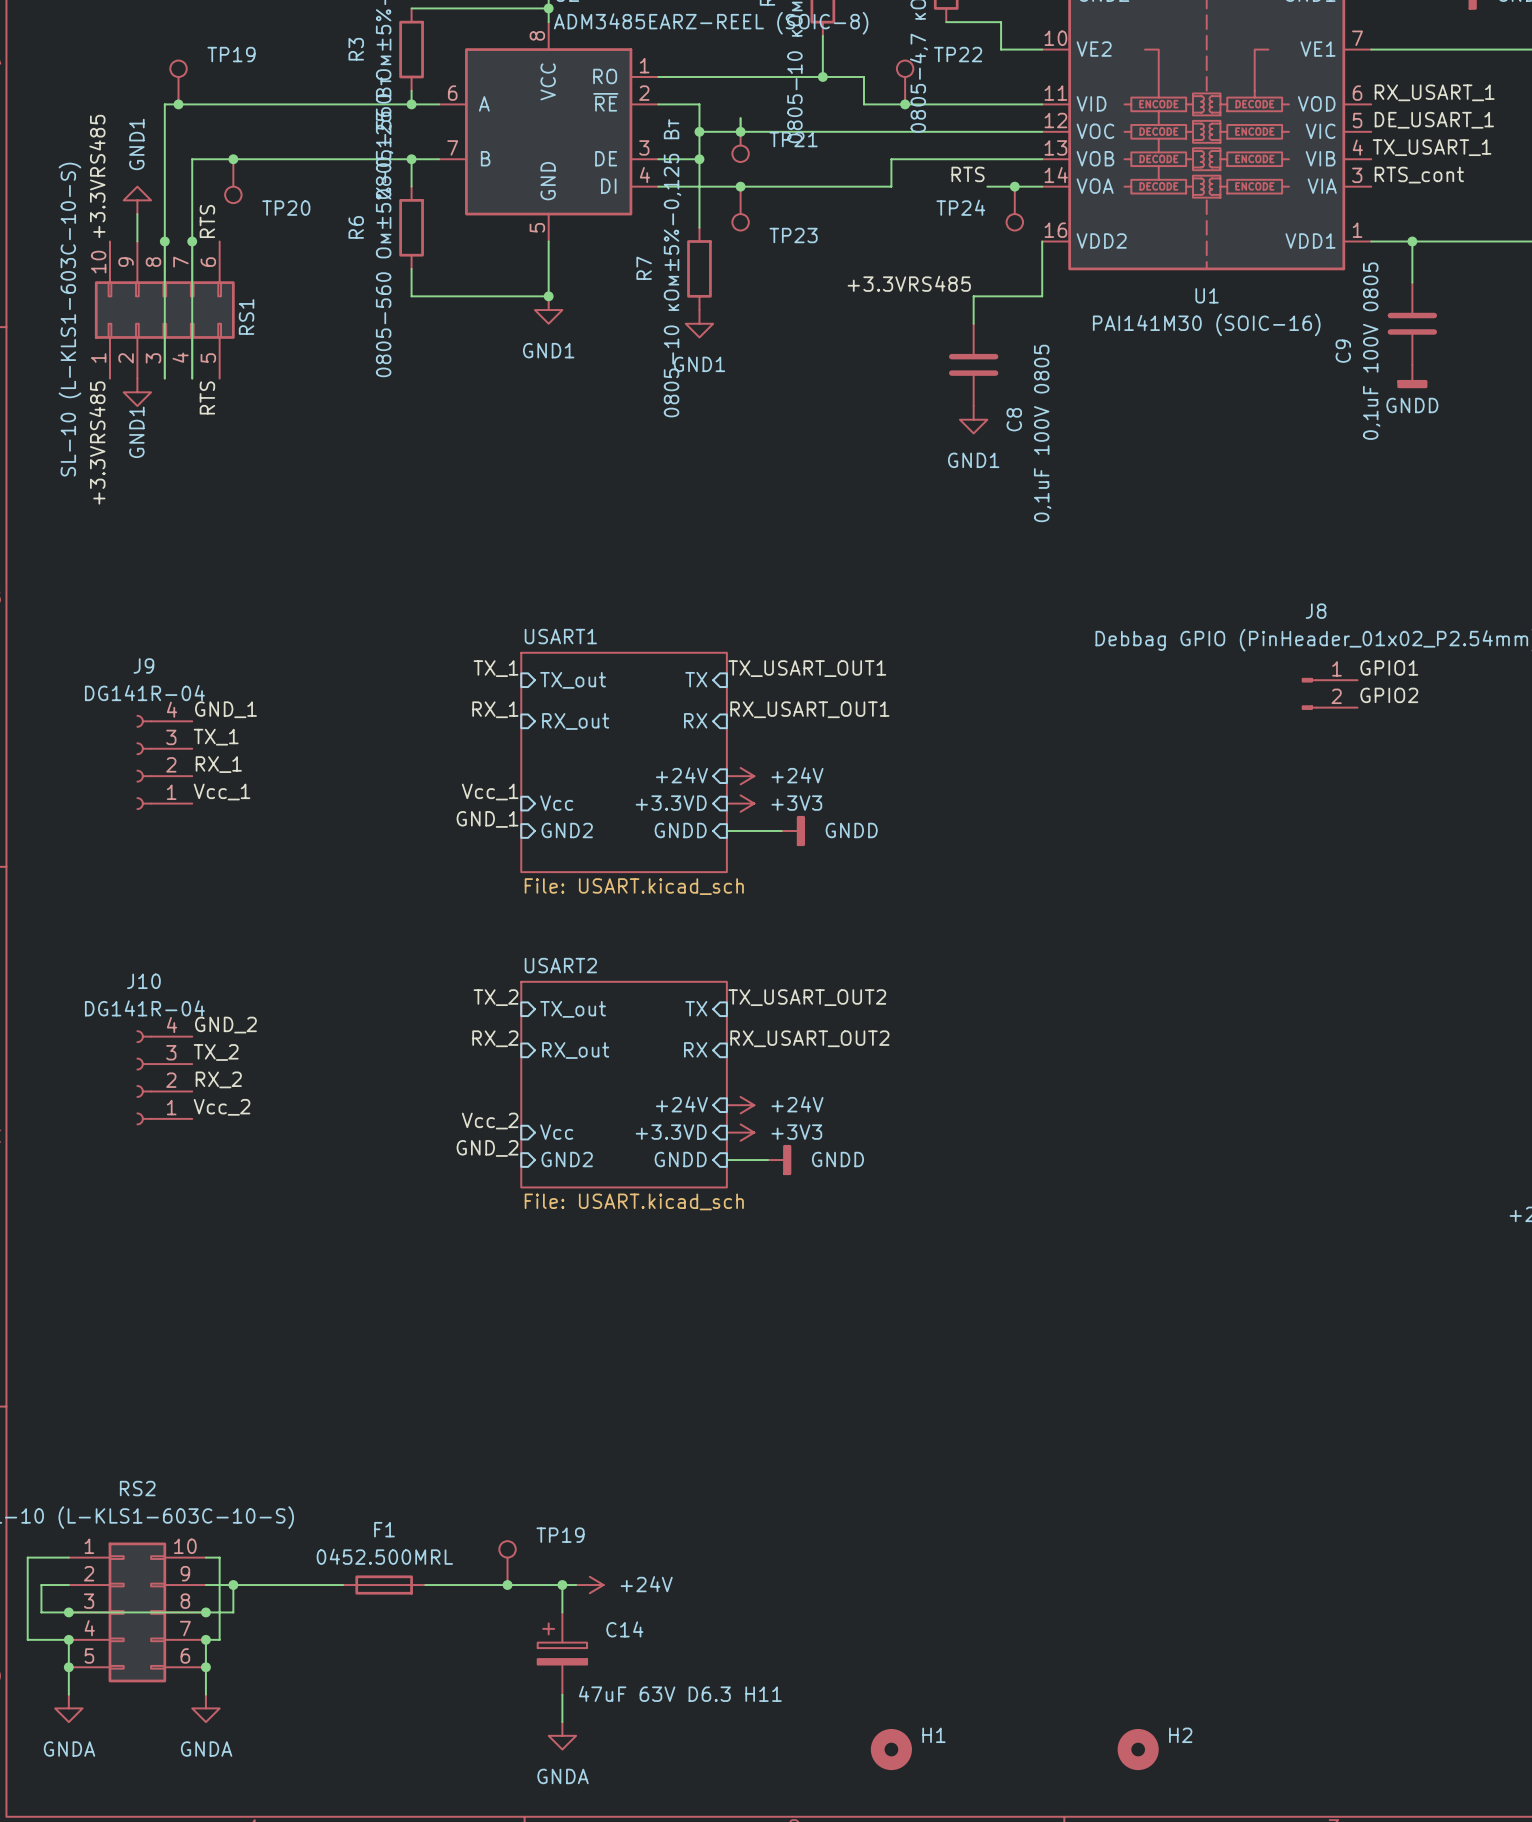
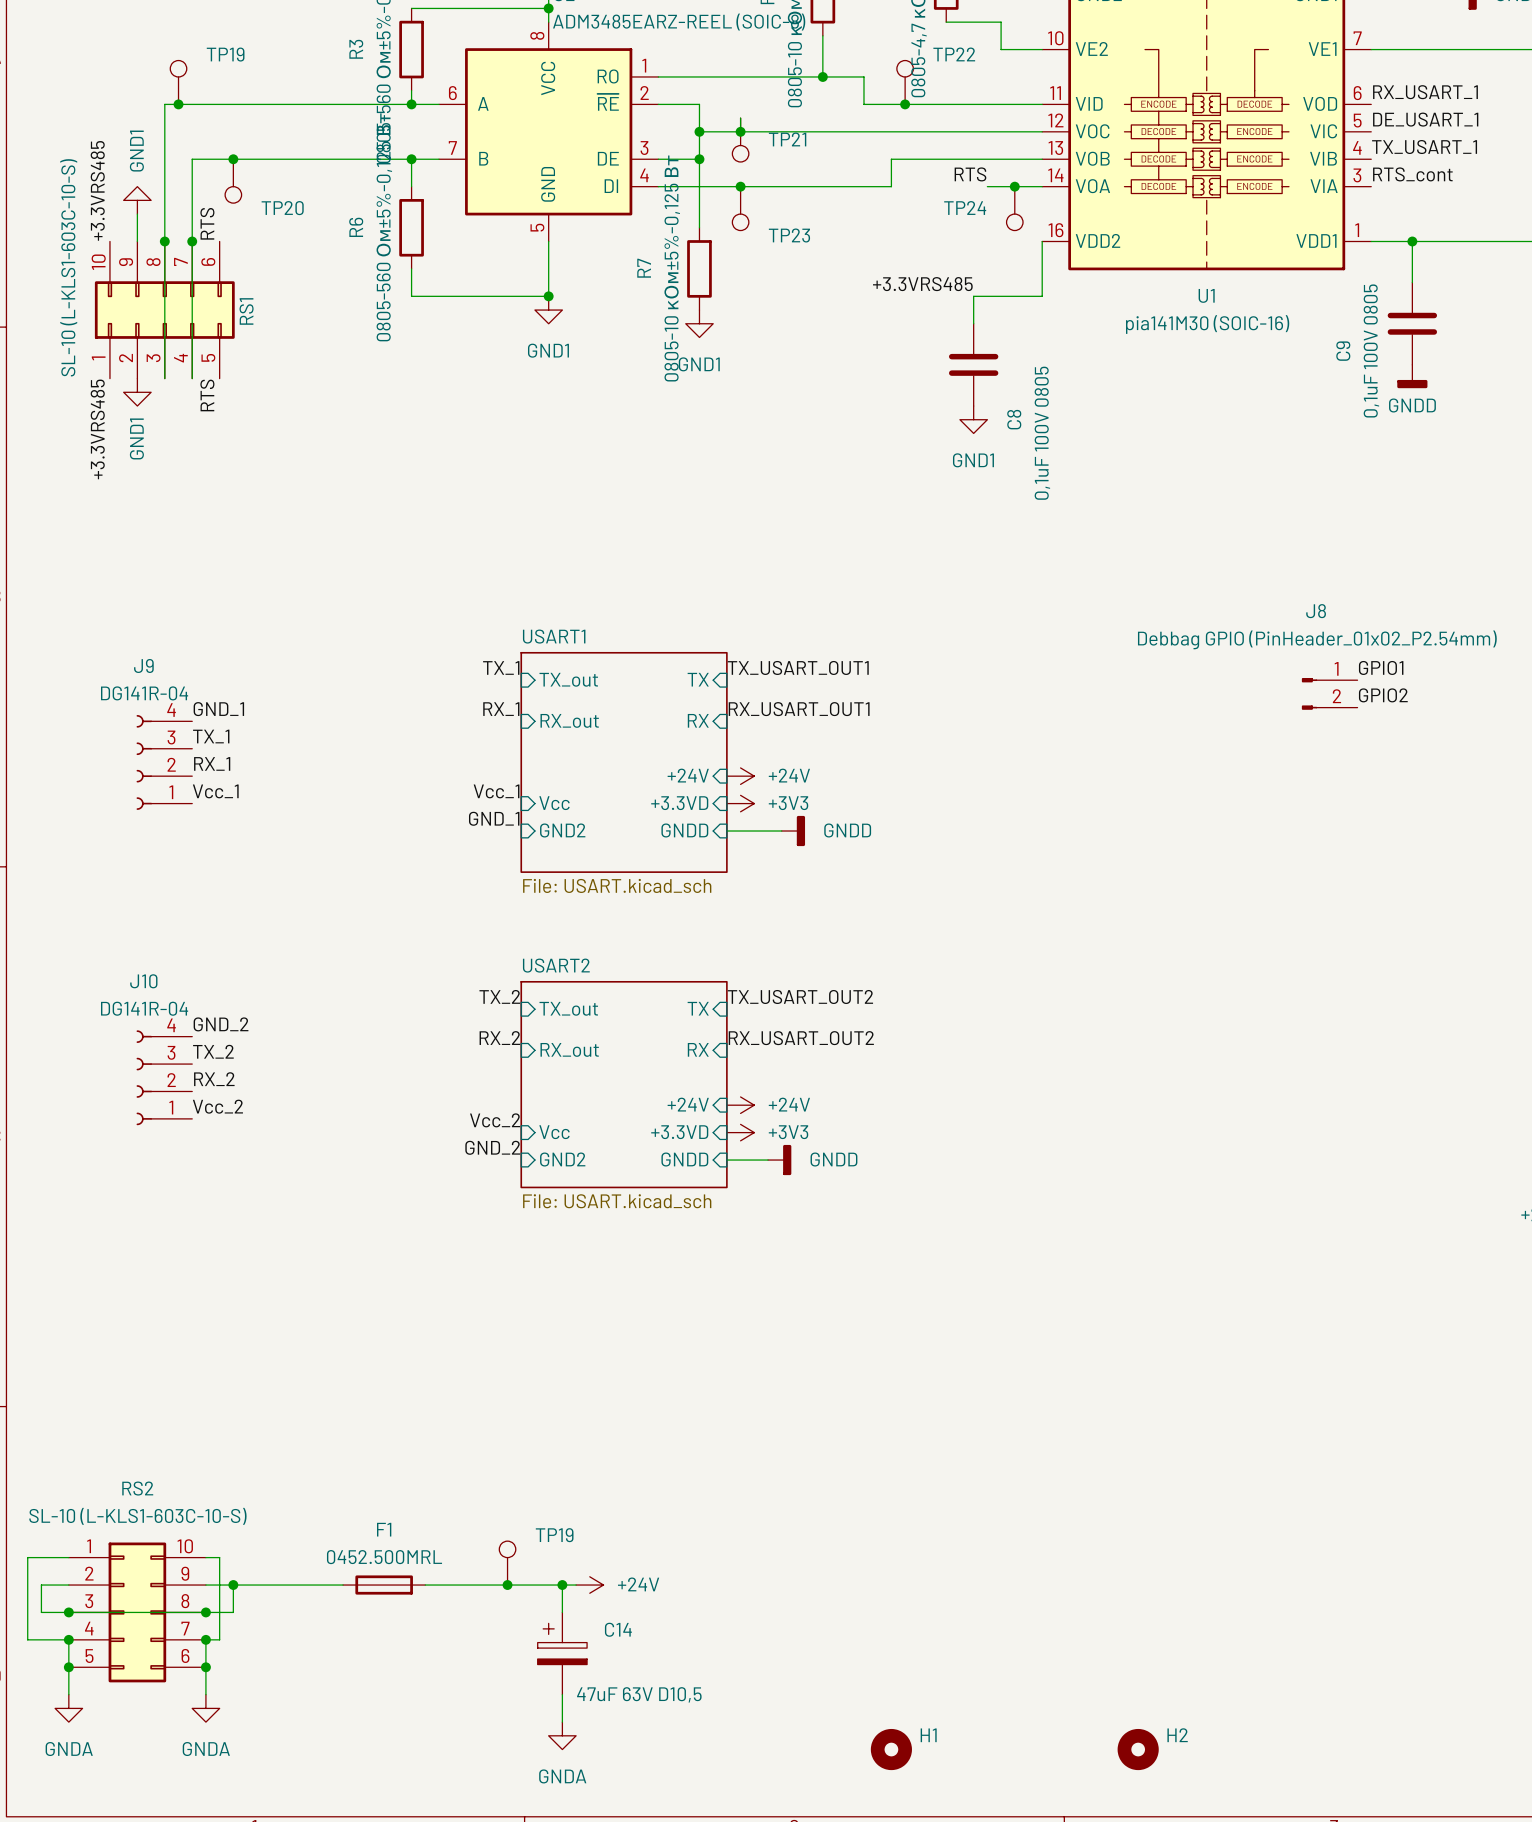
U1 value: PAI141M30 (SOIC-16) (1206, 324) -> pia141M30 (SOIC-16) (1207, 324)
C14 value: 47uF 63V D6.3 H11 (680, 1693) -> 47uF 63V D10,5 (639, 1694)

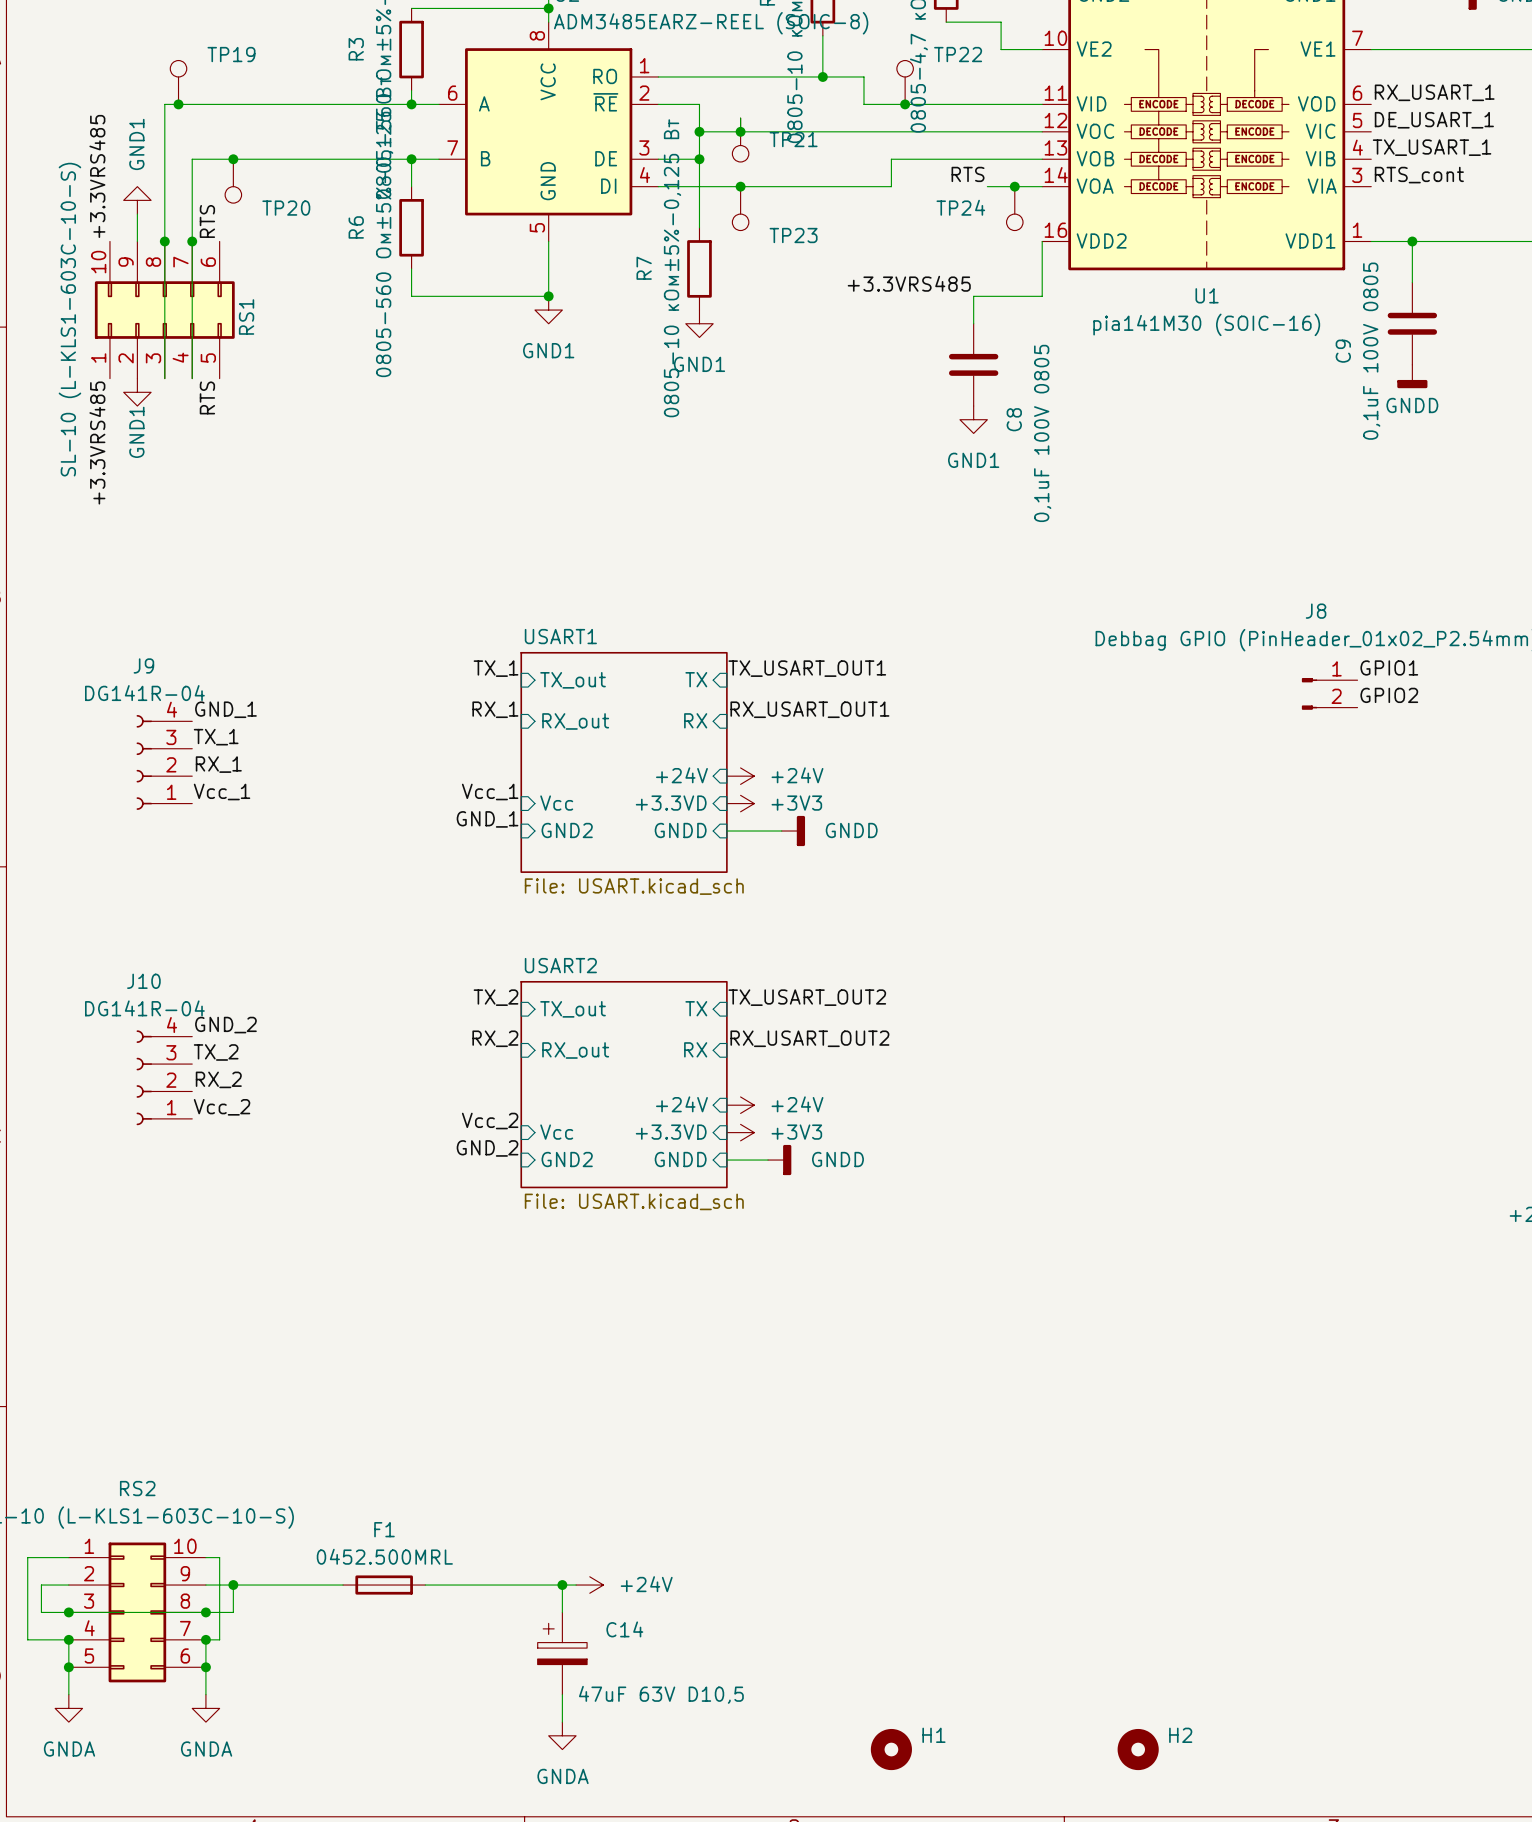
TP19: (507, 1563) -> none
junction: (507, 1585) -> none

